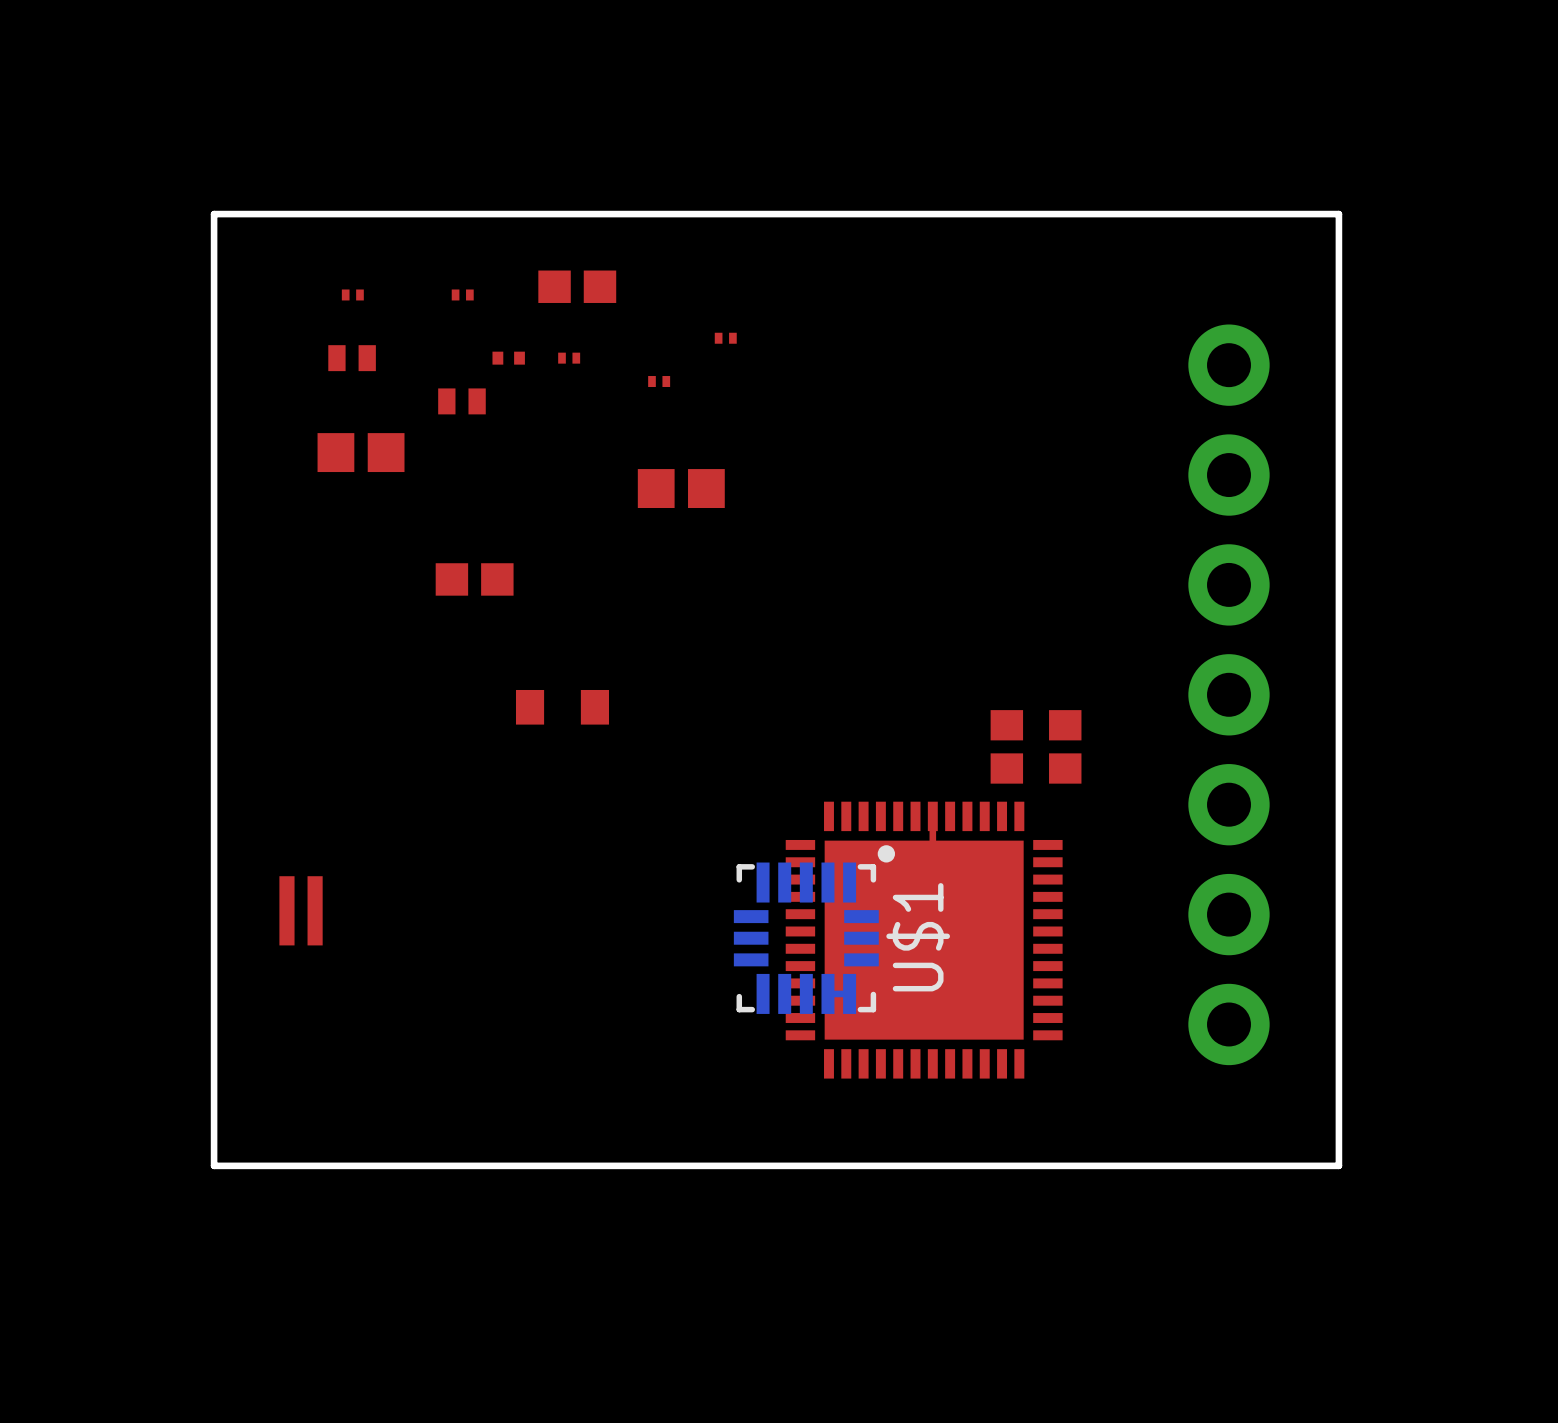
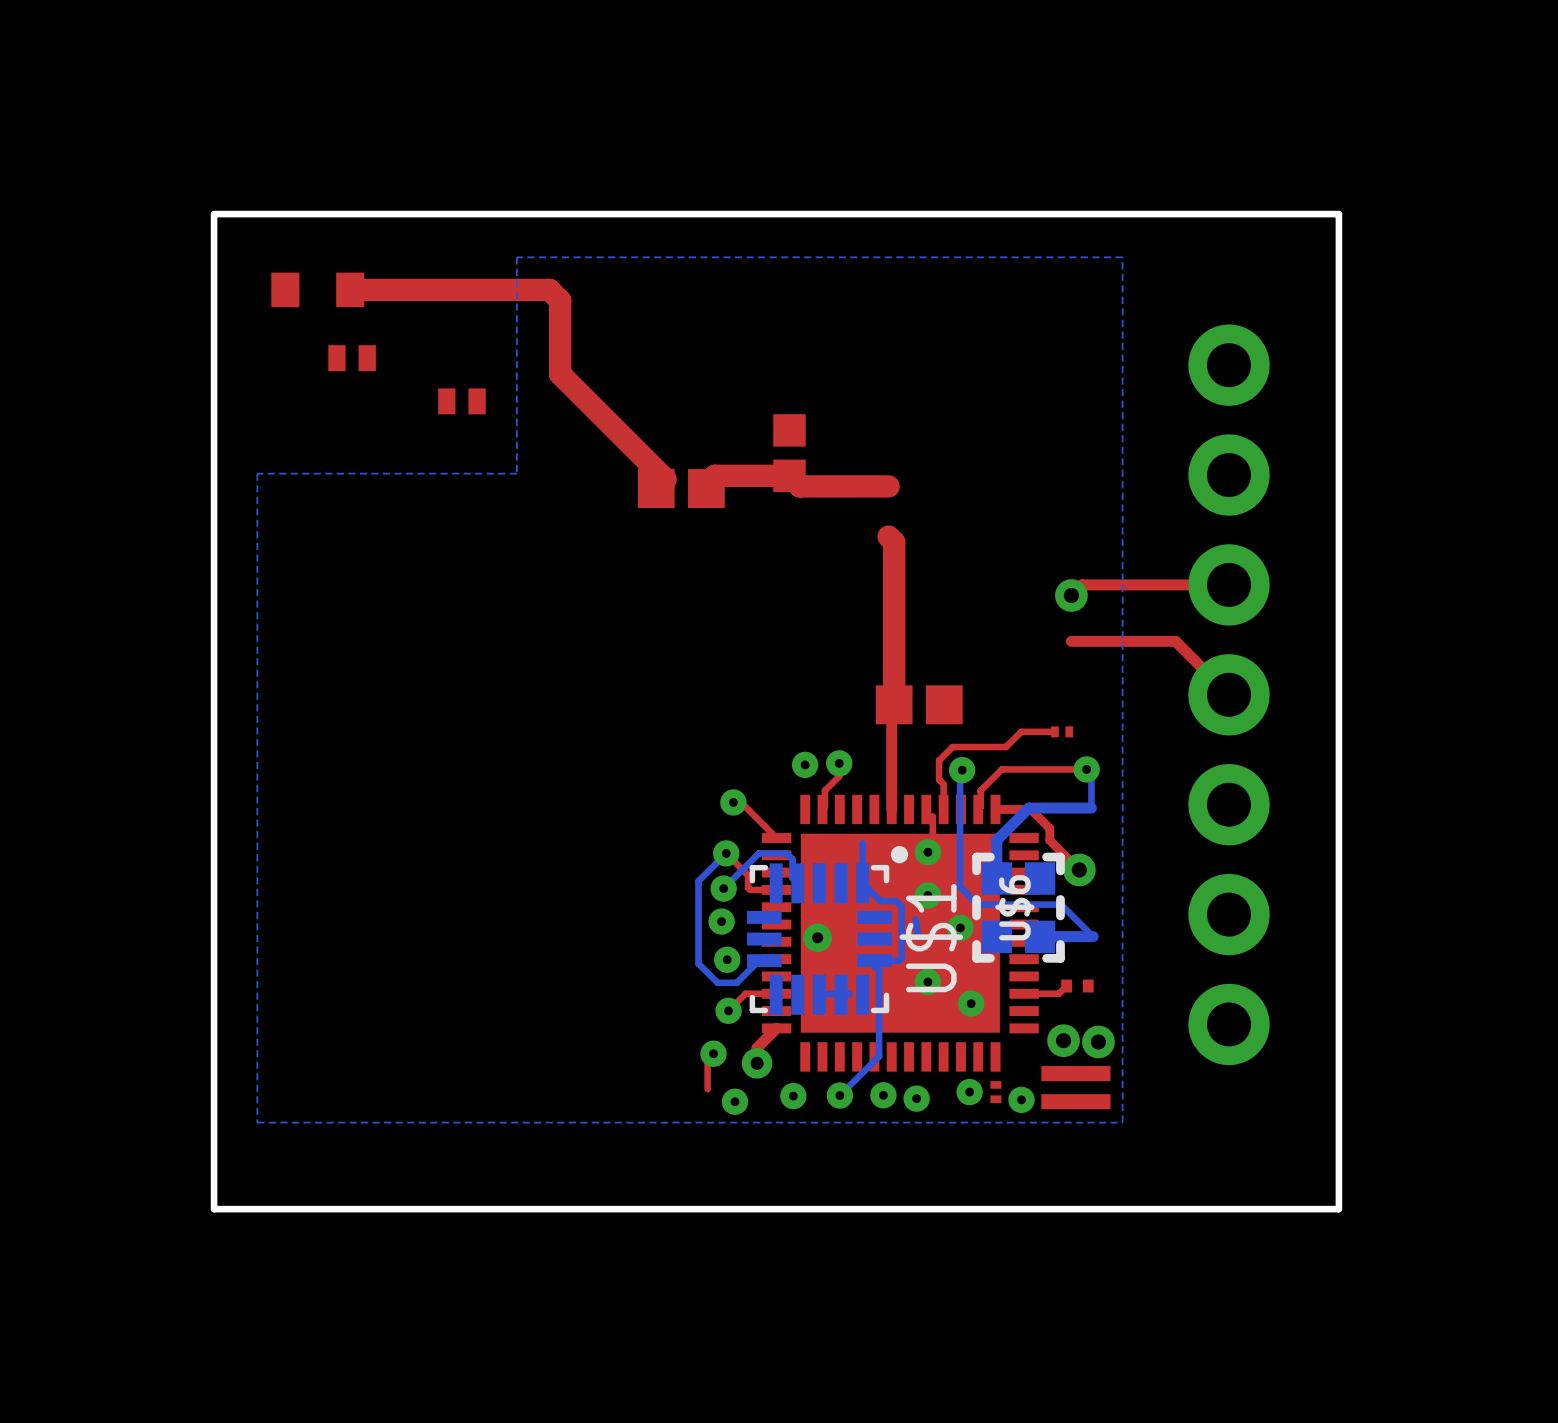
bottom zone outline: none -> (1122, 257) (1122, 1122) (257, 1122) (257, 473) (516, 473) (516, 257) (1122, 257)
part: (577, 286) -> none
part footprint: [341, 289, 364, 301] -> [271, 272, 365, 308]
top track: none -> (350, 289) (549, 289) (560, 300) (560, 374) (665, 479)
part: (462, 294) -> none
part: (725, 338) -> none
part position: (508, 358) -> (1077, 986)
part: (569, 358) -> none
part: (659, 381) -> none
part position: (361, 452) -> (919, 704)
part: none -> (789, 453)
top track: none -> (711, 479) (714, 475) (789, 475) (800, 486) (888, 486)
top track: none -> (888, 536) (894, 542) (891, 809)
part: (474, 579) -> none
top track: none -> (1229, 584) (1081, 584) (1071, 595)
via: none -> (1071, 595)
top track: none -> (1071, 641) (1175, 641) (1229, 694)
part: (562, 707) -> none
part footprint: [990, 710, 1082, 784] -> [1051, 726, 1074, 738]
top track: none -> (1054, 731) (1021, 731) (1006, 747) (952, 747) (939, 760) (939, 779) (943, 784) (943, 809)
top track: none -> (839, 763) (839, 776) (824, 790) (824, 807) (822, 809)
via: none -> (839, 763)
via: none -> (805, 764)
bottom track: none -> (1086, 769) (1091, 774) (1091, 808) (1029, 808) (996, 840) (996, 878)
top track: none -> (1086, 769) (1001, 769) (980, 790) (980, 807) (978, 809)
via: none -> (1086, 769)
bottom track: none -> (962, 770) (960, 772) (960, 887) (977, 904) (1061, 904) (1093, 936) (1040, 936)
via: none -> (962, 770)
top track: none -> (733, 802) (741, 802) (776, 838)
via: none -> (733, 802)
top track: none -> (995, 809) (1030, 809) (1049, 828) (1049, 840) (1079, 869)
bottom track: none -> (862, 843) (862, 883) (880, 901) (896, 901) (901, 906) (901, 958) (899, 960) (874, 960) (874, 966) (879, 970) (879, 1056) (839, 1095)
via: none -> (927, 852)
bottom track: none -> (726, 853) (698, 881) (698, 963) (717, 982) (736, 982) (758, 960) (764, 960)
top track: none -> (726, 853) (748, 875) (748, 887) (750, 889) (776, 889)
via: none -> (726, 853)
via: none -> (1079, 869)
bottom track: none -> (797, 883) (792, 878) (792, 859) (786, 853) (758, 853) (723, 888)
via: none -> (723, 888)
via: none -> (927, 895)
U$6: none -> (1018, 907)
part rotation: 0° (301, 910) -> 90° clockwise (1075, 1087)
part position: (301, 910) -> (1075, 1087)
bottom track: none -> (915, 919) (917, 934)
via: none -> (721, 921)
via: none -> (960, 927)
U$1 position: (814, 929) -> (827, 930)
via: none -> (817, 937)
part position: (924, 940) -> (900, 933)
via: none -> (727, 959)
via: none -> (927, 982)
top track: none -> (1066, 986) (1058, 993) (1024, 993)
top track: none -> (776, 993) (745, 993) (728, 1010)
via: none -> (971, 1003)
via: none -> (728, 1010)
top track: none -> (776, 1028) (757, 1047) (757, 1063)
via: none -> (1063, 1040)
via: none -> (1098, 1042)
top track: none -> (713, 1053) (707, 1059) (707, 1089)
via: none -> (713, 1053)
via: none -> (757, 1063)
via: none -> (969, 1092)
part: none -> (995, 1092)
via: none -> (839, 1095)
via: none -> (883, 1095)
via: none -> (793, 1096)
via: none -> (916, 1098)
via: none -> (1021, 1099)
via: none -> (735, 1101)
board edge: (1338, 1165) (214, 1165) -> (1338, 1165) (1338, 1209) (214, 1209) (214, 1165)

